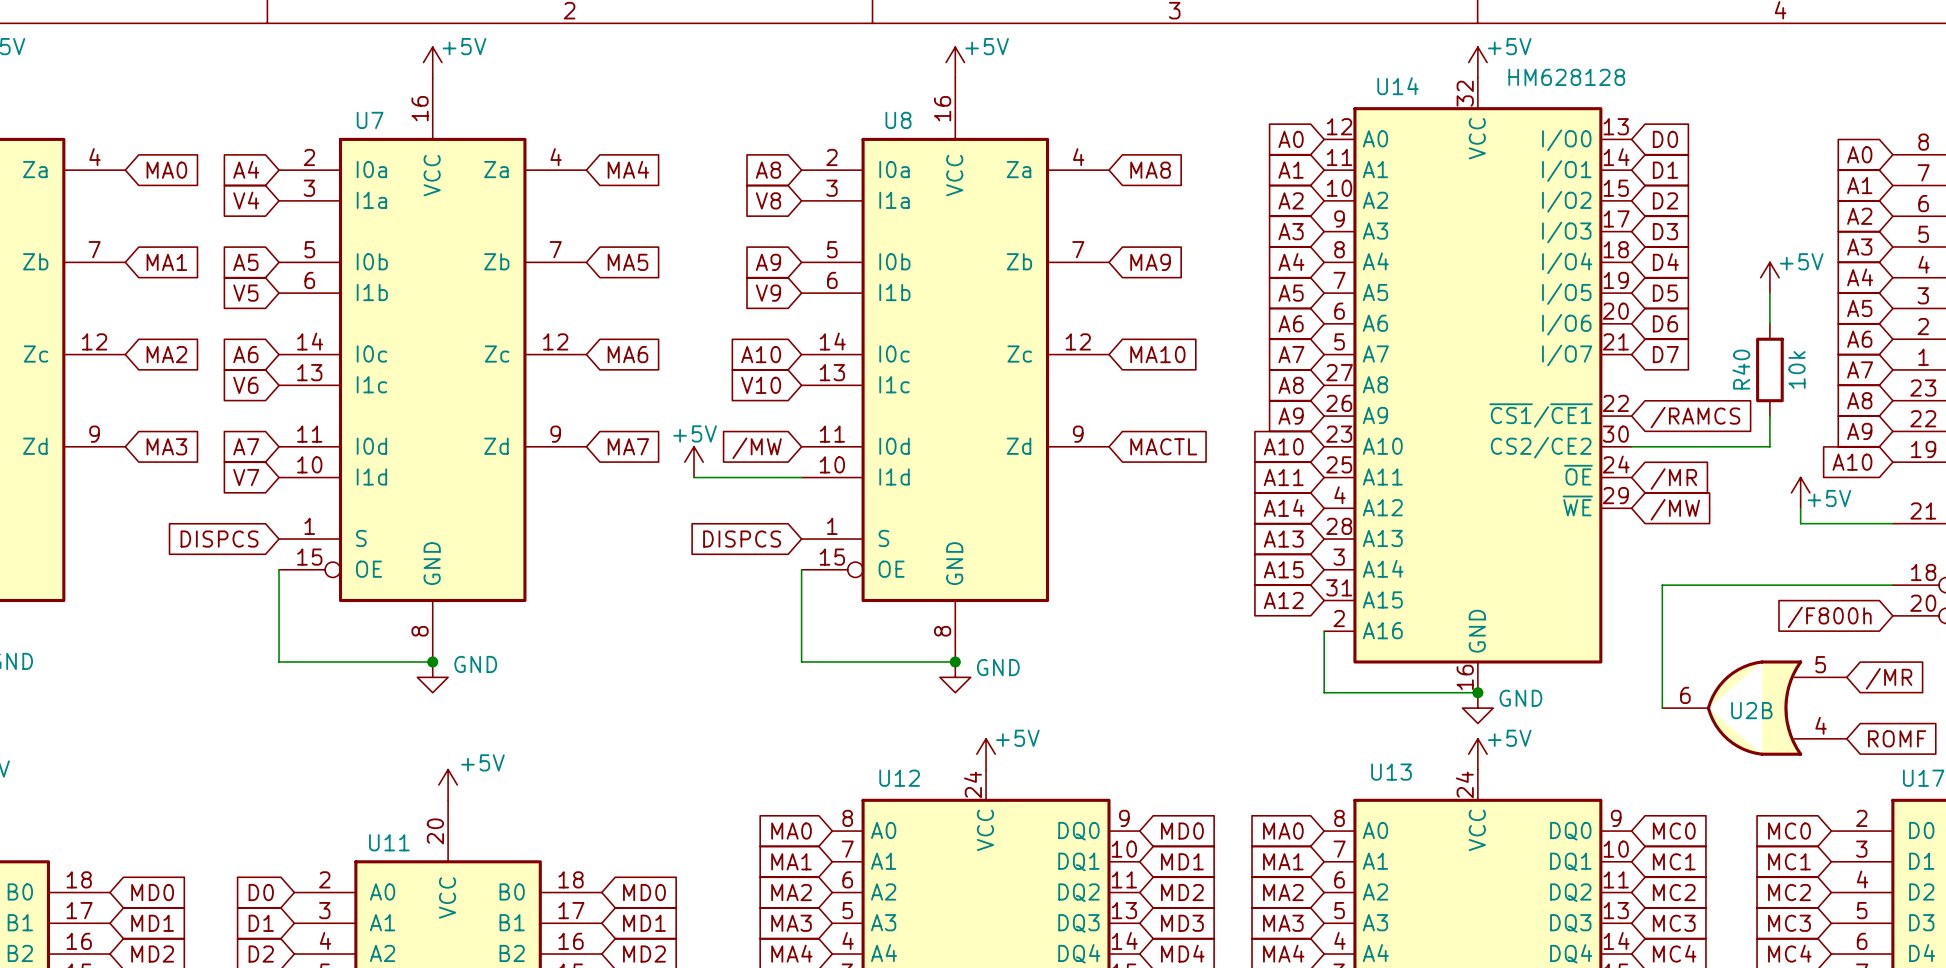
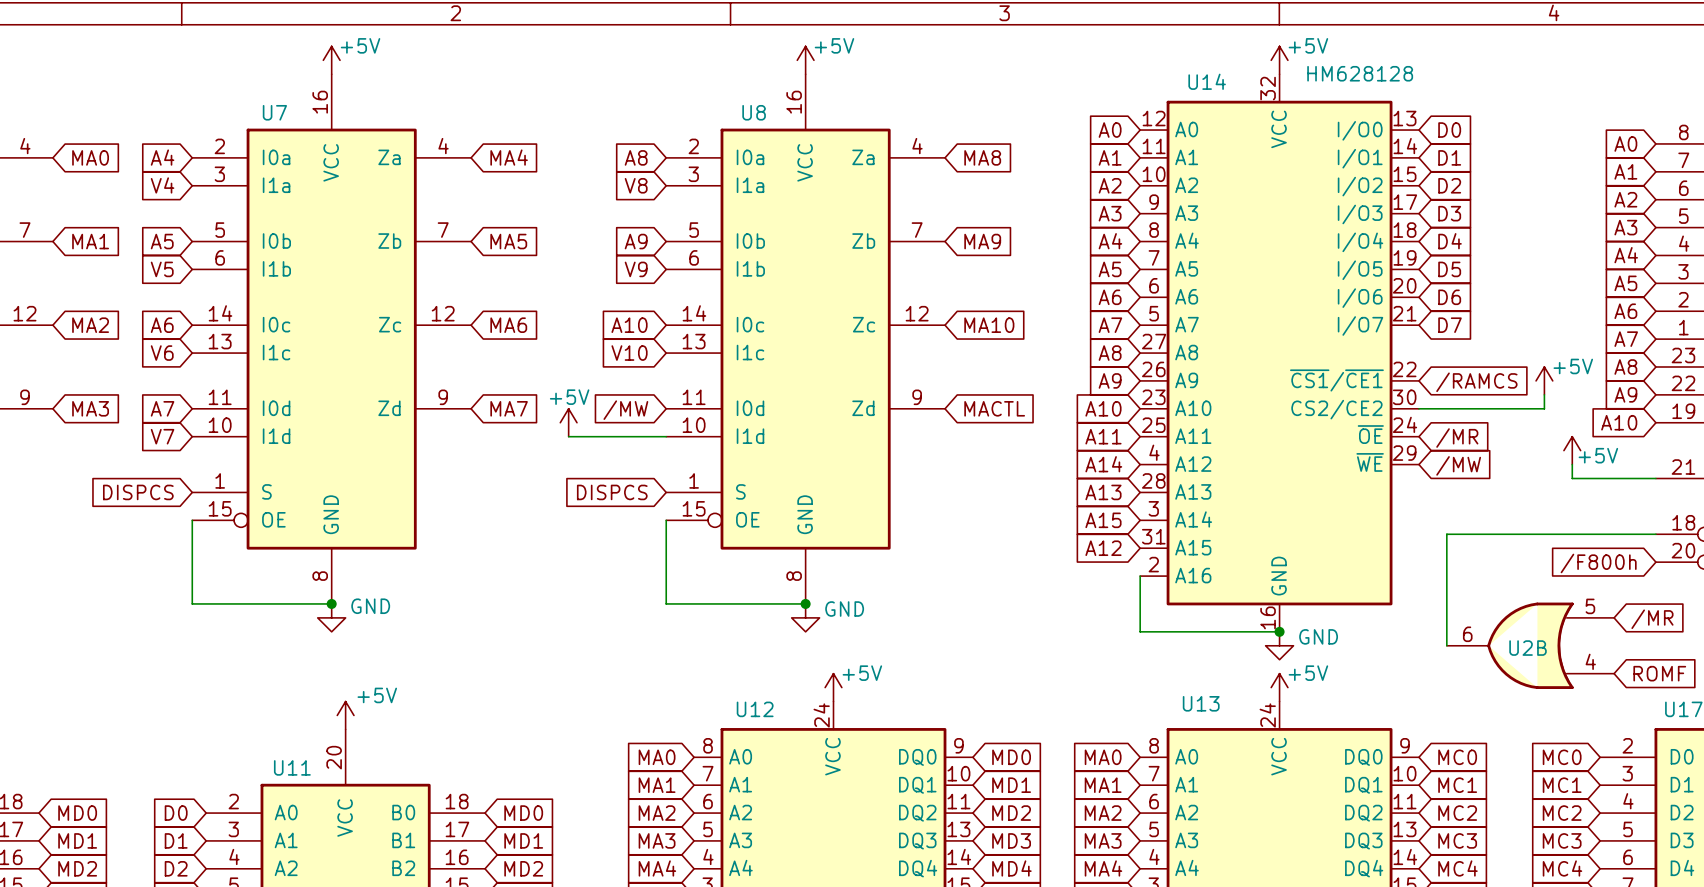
power symbol position: +5V (1769, 277) -> +5V (1544, 380)
wire: (1769, 293) (1769, 323) -> none
R40: 10k (1769, 369) -> none

